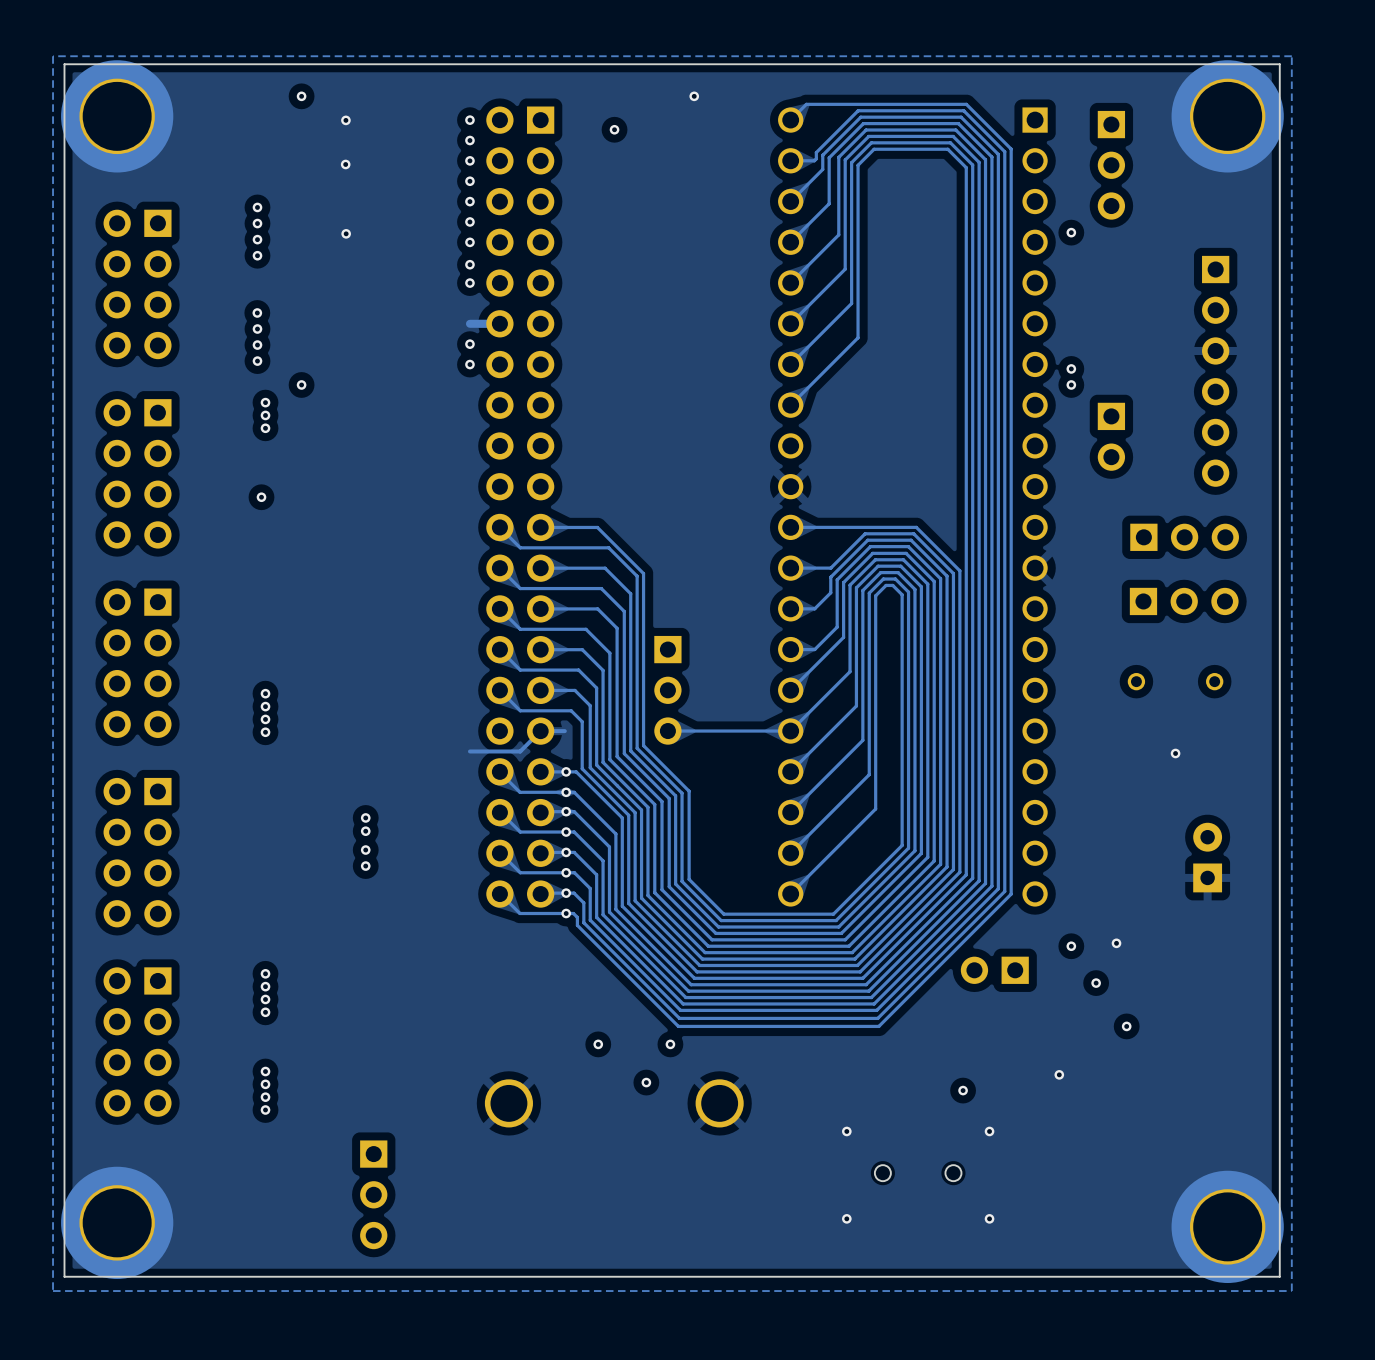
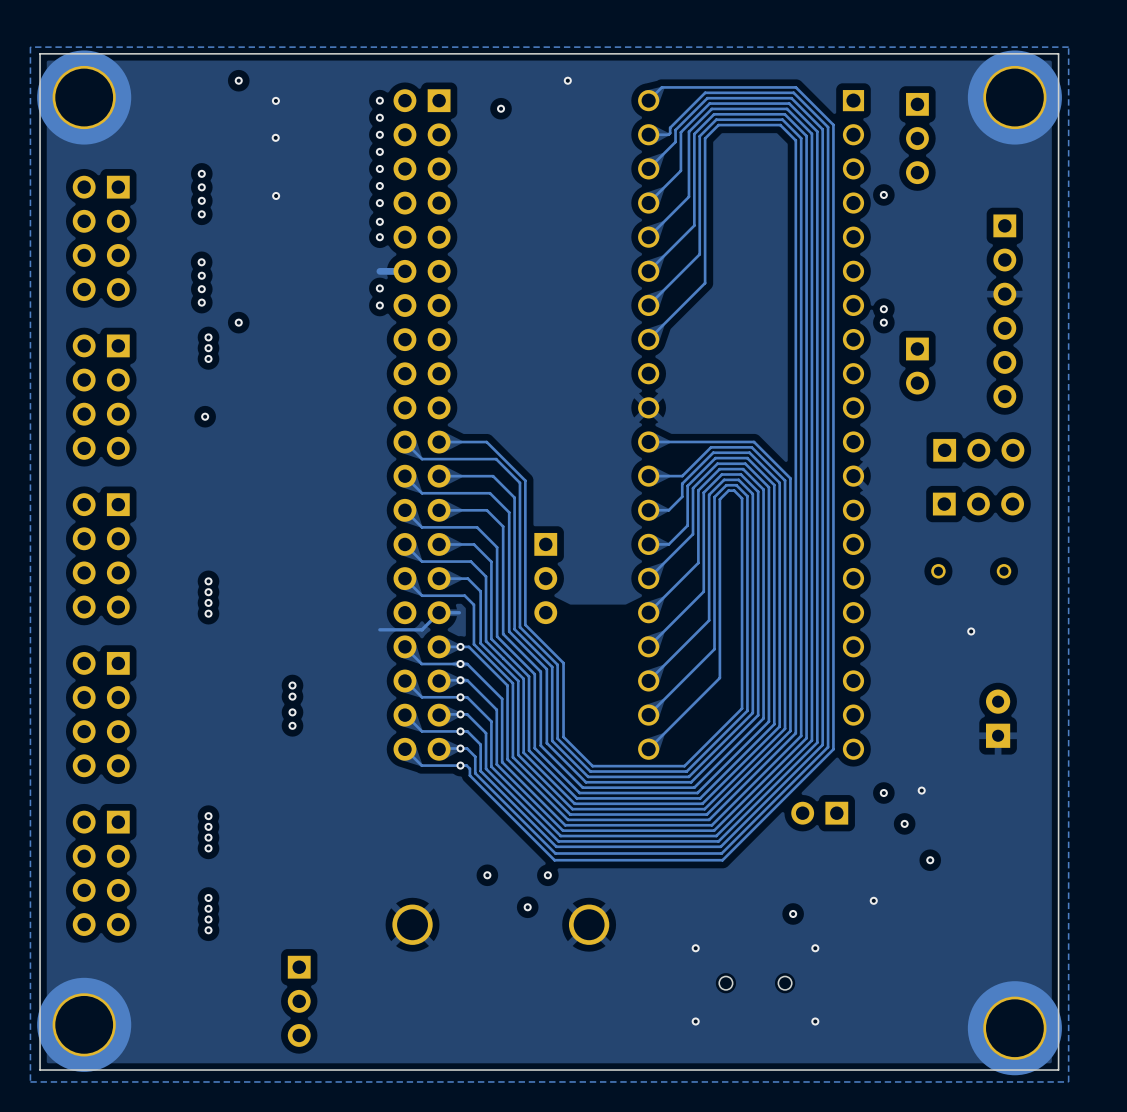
track: (790, 731) (667, 731) -> none

